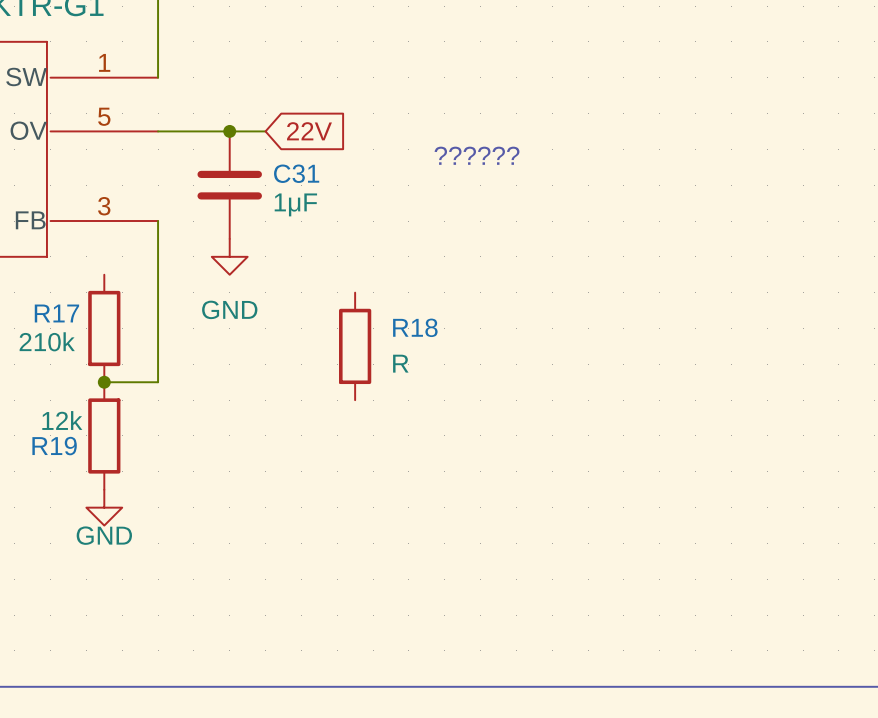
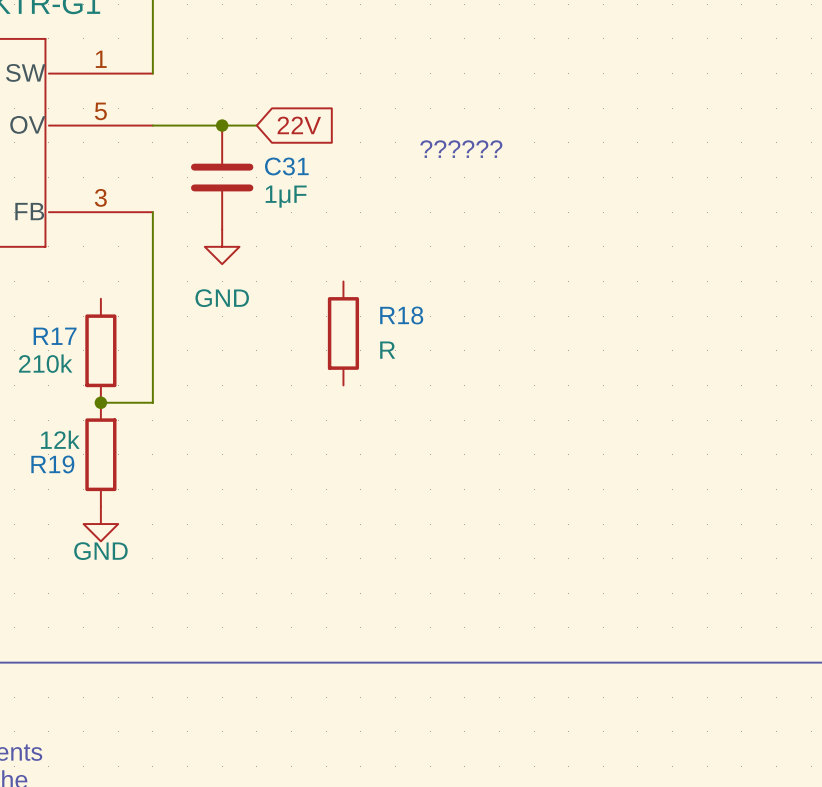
R17 position: (104, 328) -> (100, 350)
wire: (104, 382) (158, 382) -> (100, 402) (152, 402) (152, 368)
junction position: (104, 382) -> (100, 402)
R19 position: (104, 435) -> (100, 454)
power symbol position: GND (104, 507) -> GND (100, 524)

